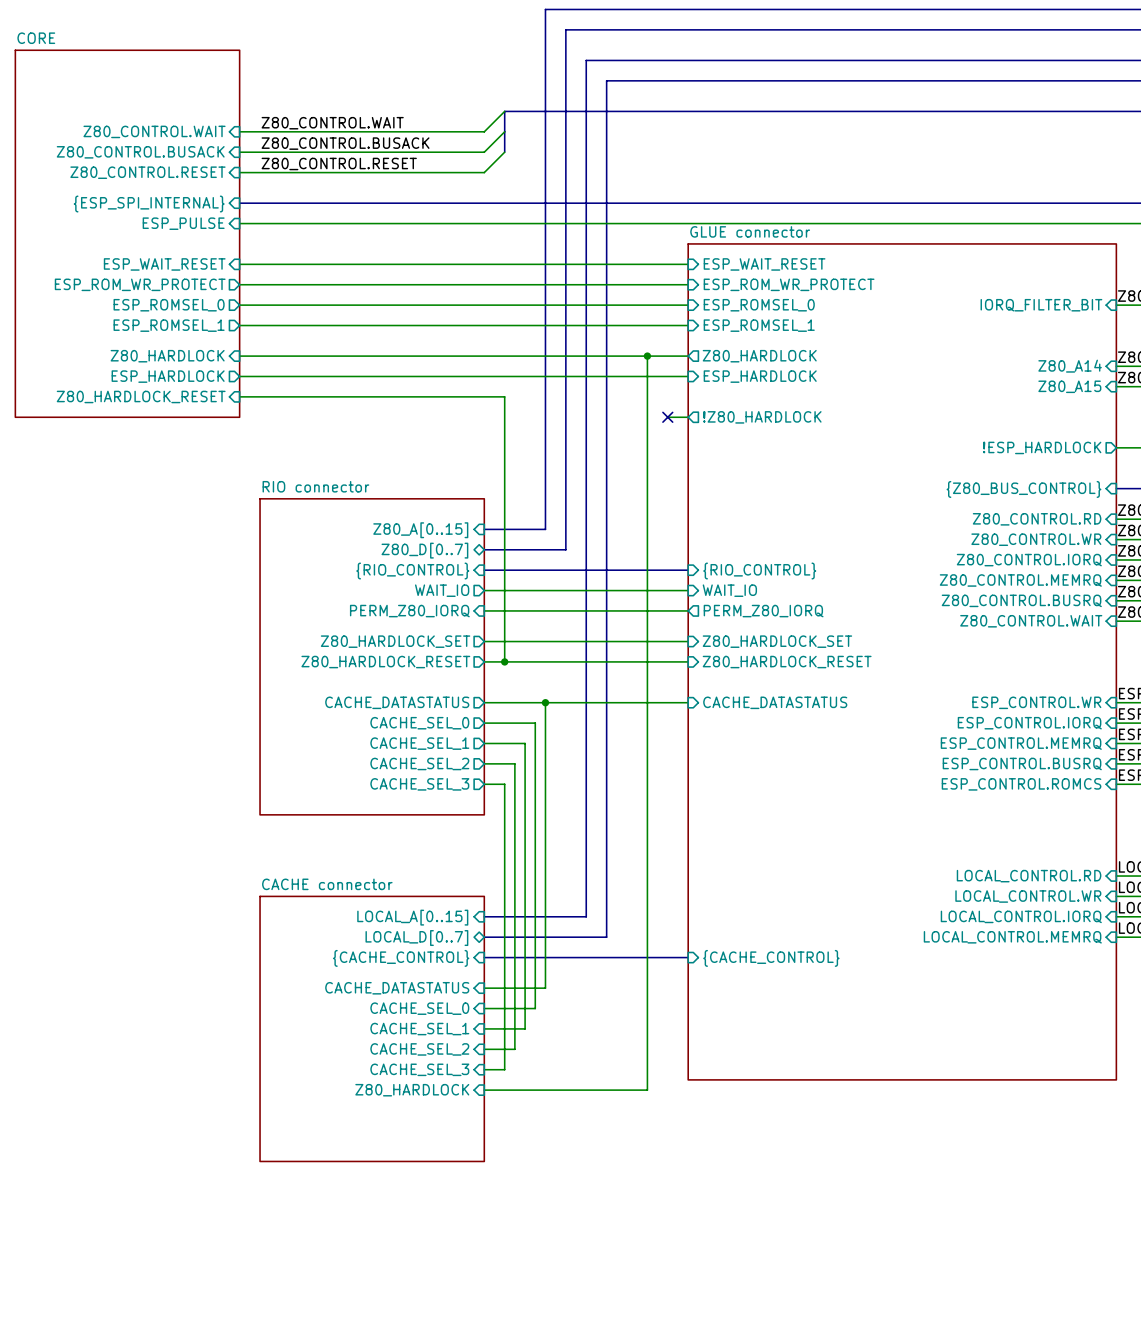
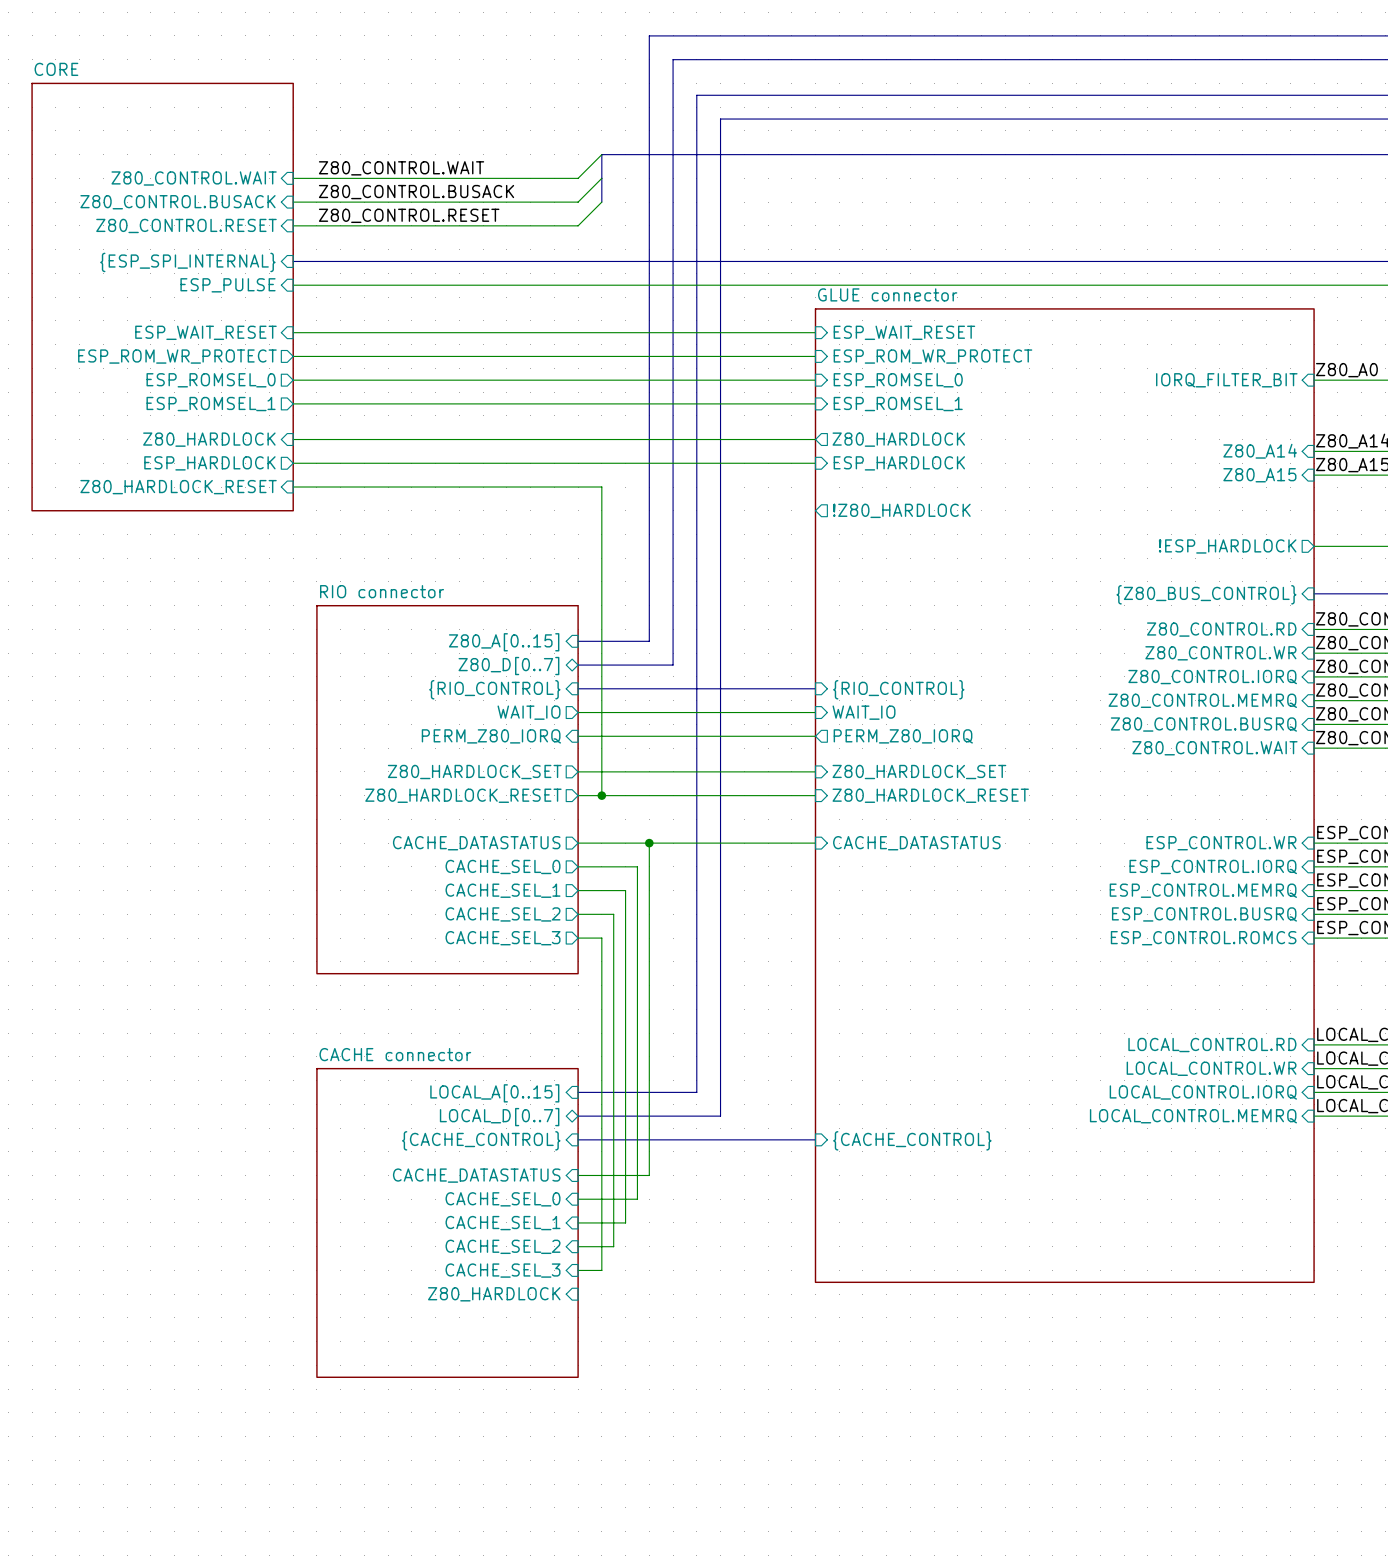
wire: (647, 356) (647, 1090) (484, 1090) -> none
junction: (647, 356) -> none
wire: (667, 417) (688, 417) -> none
no-connect mark: (667, 417) -> none

